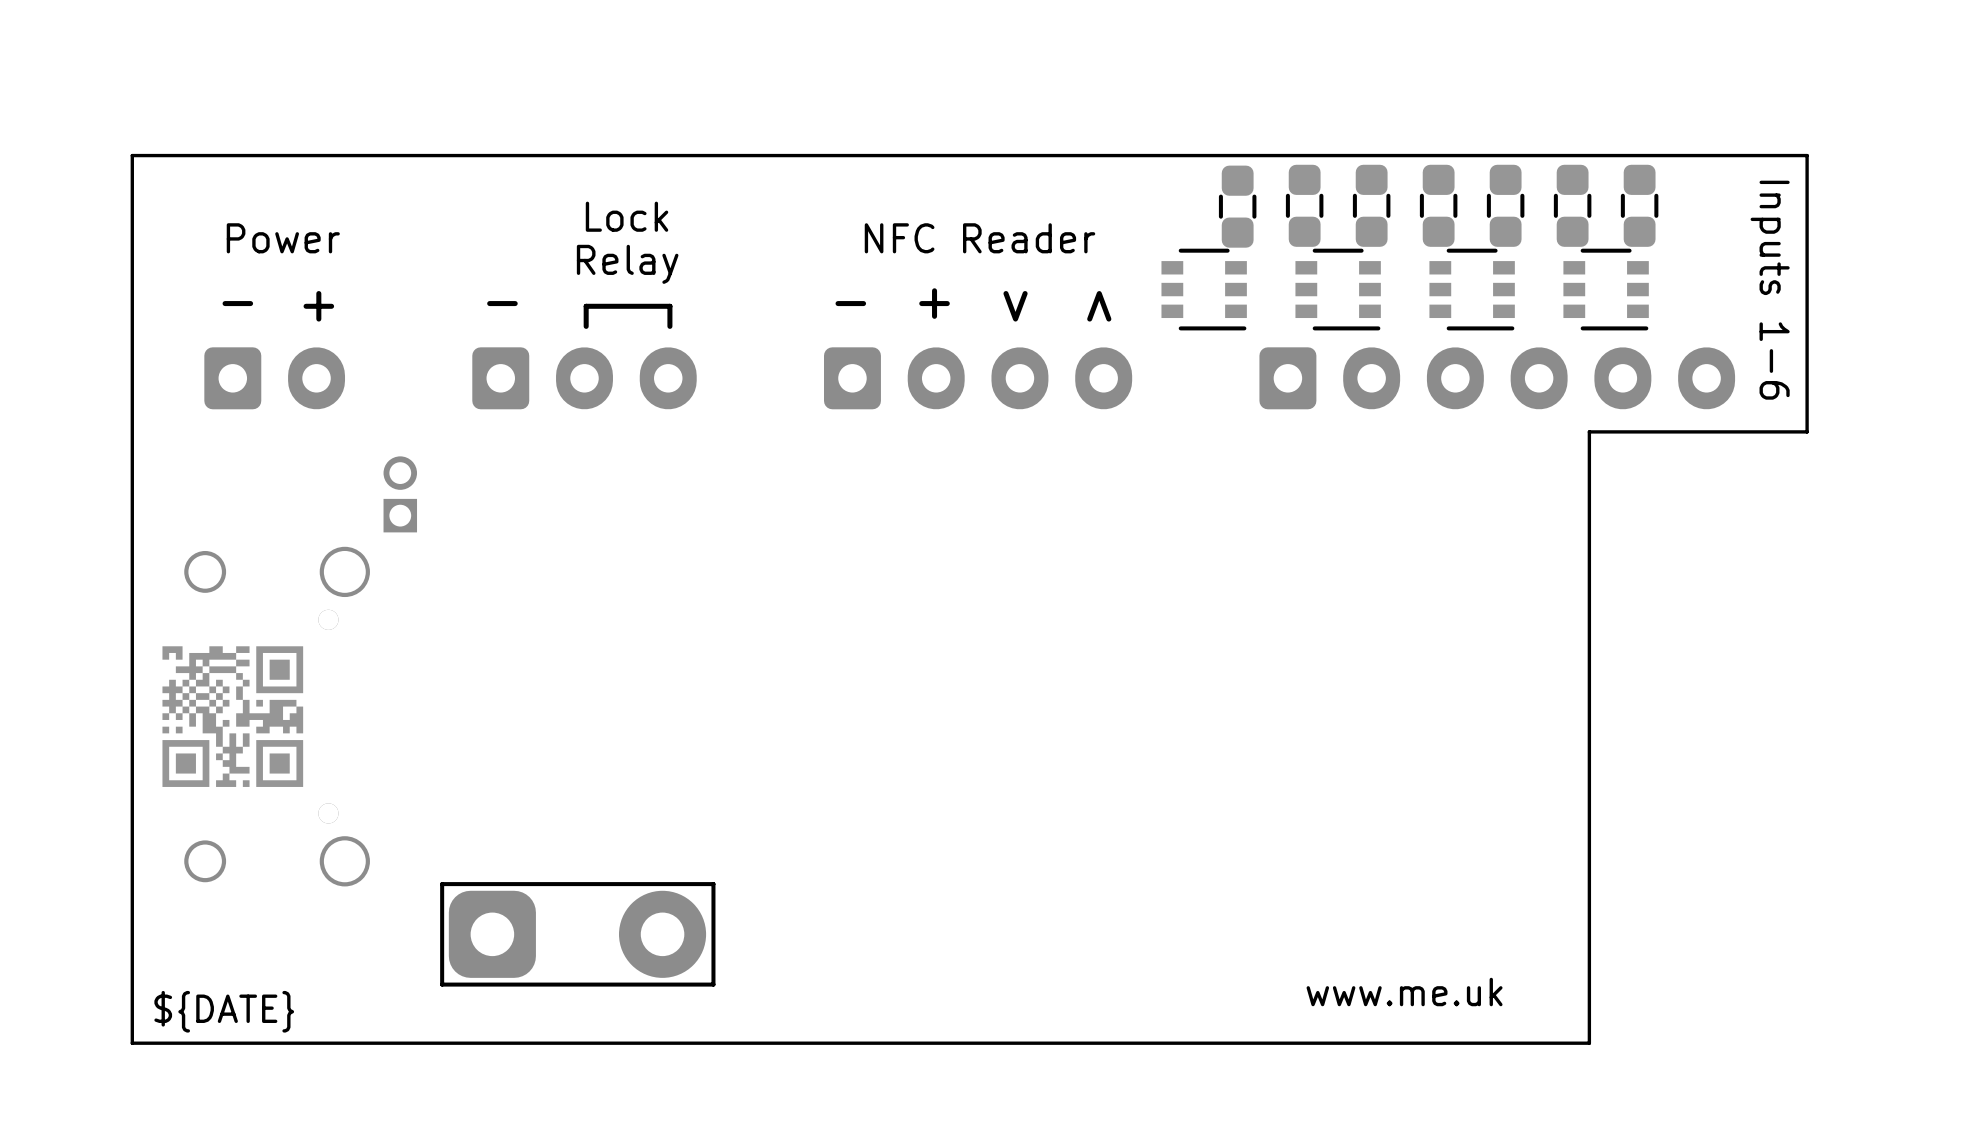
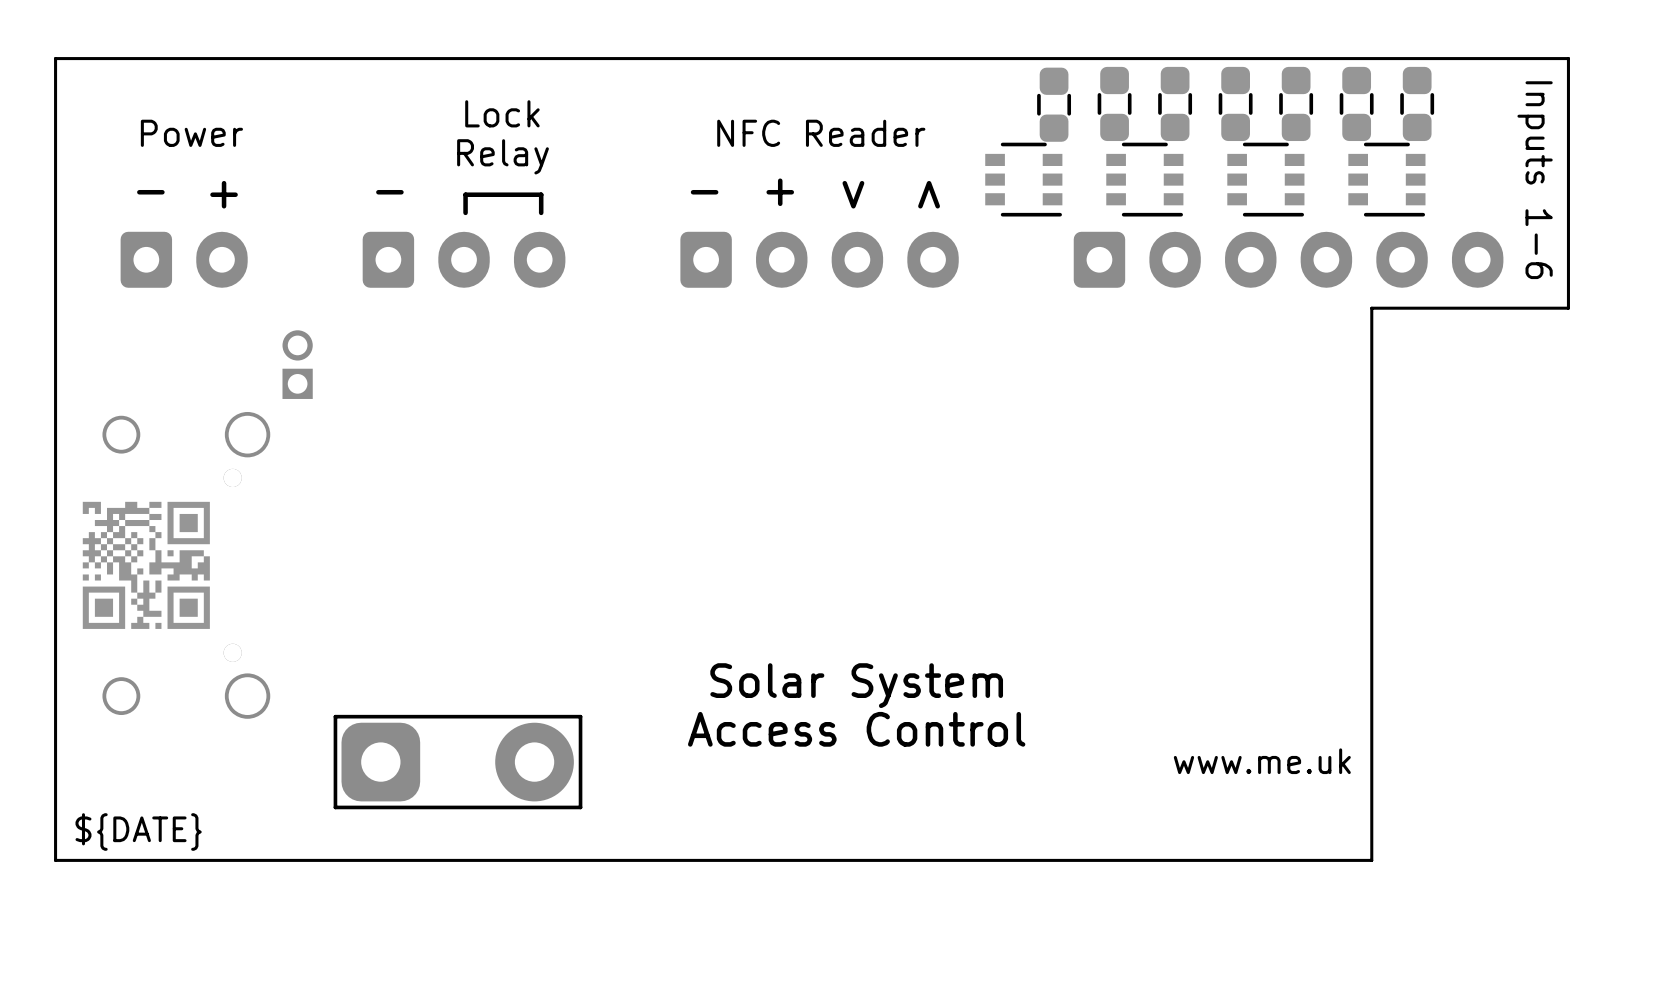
text: none -> Solar System (856, 685)
text: none -> Access Control (856, 729)
text position: www.me.uk (1404, 992) -> www.me.uk (1262, 761)

